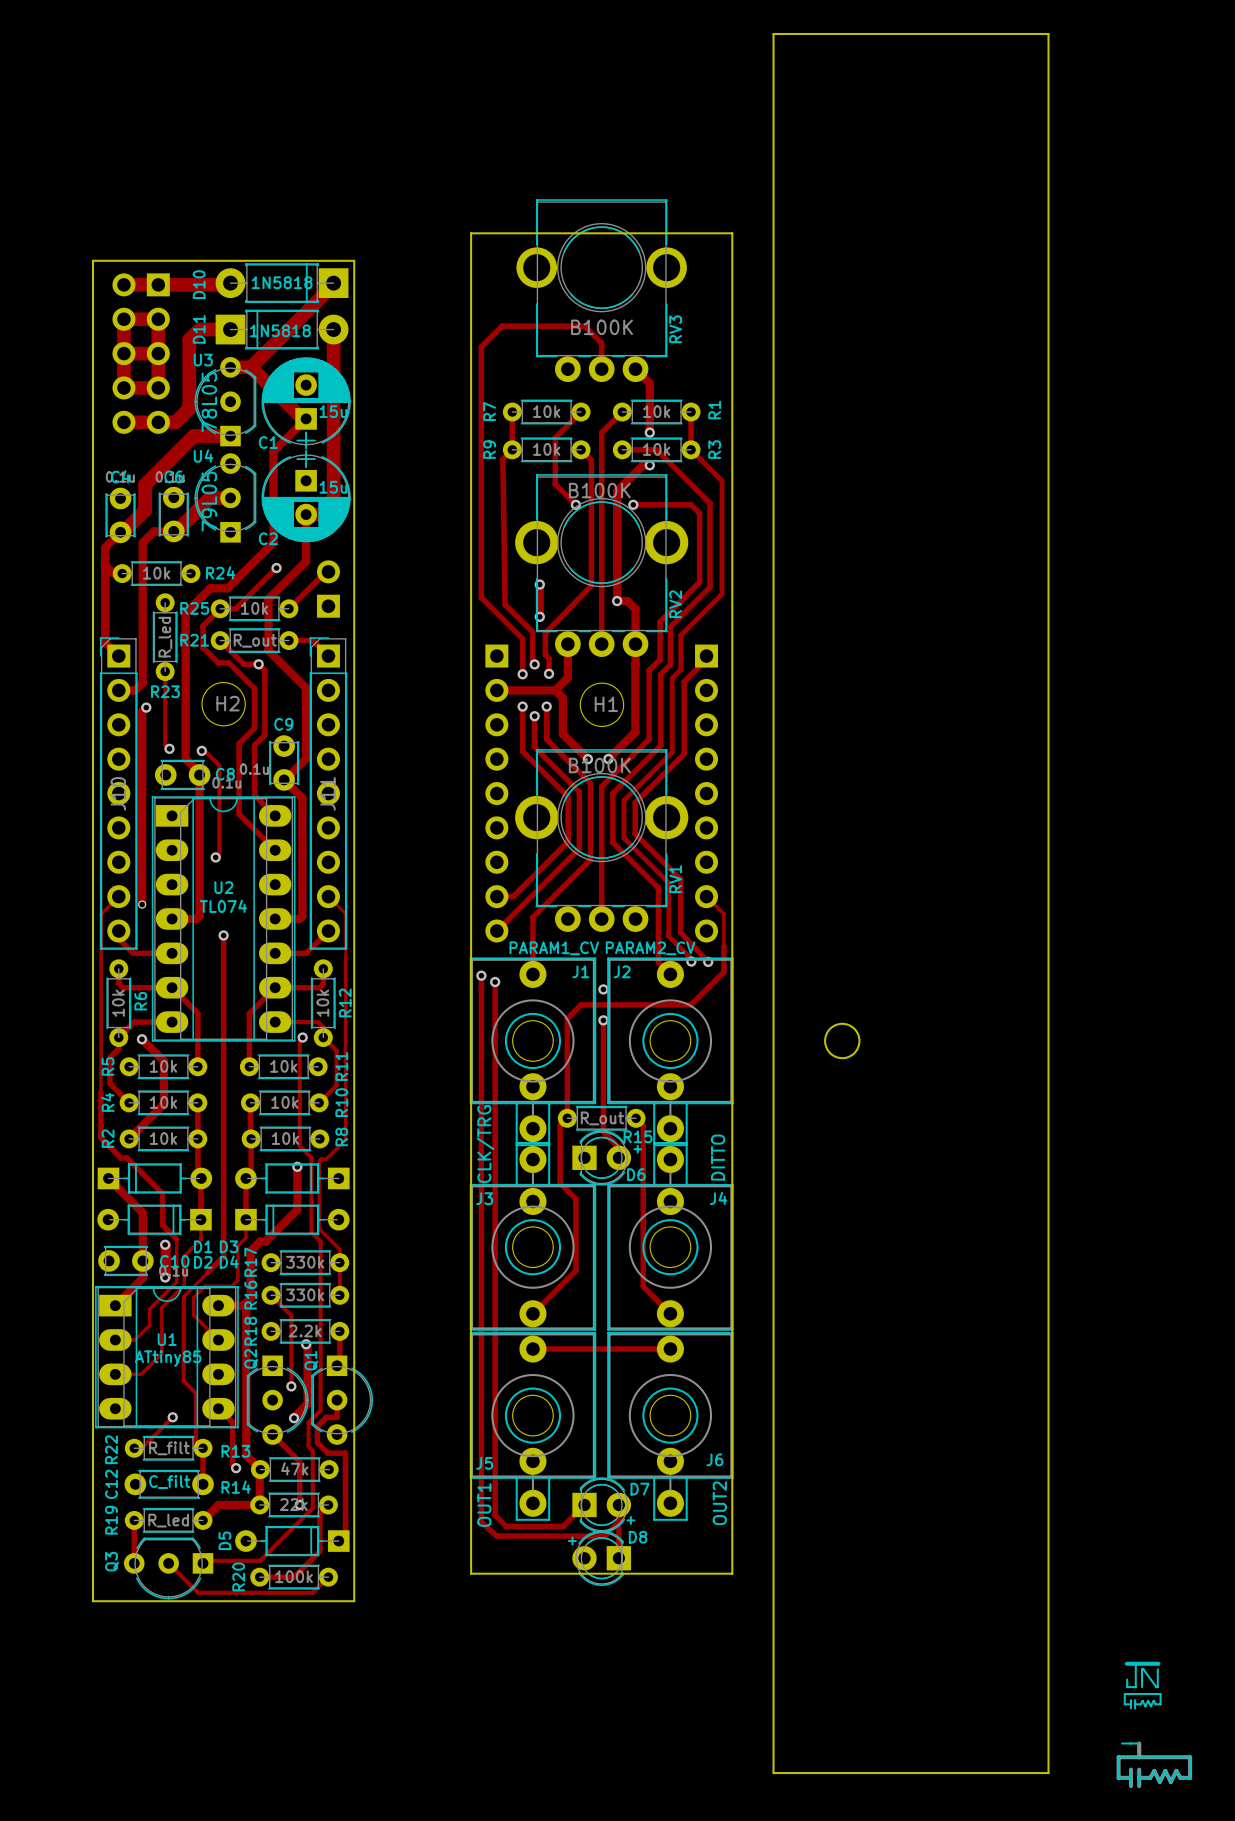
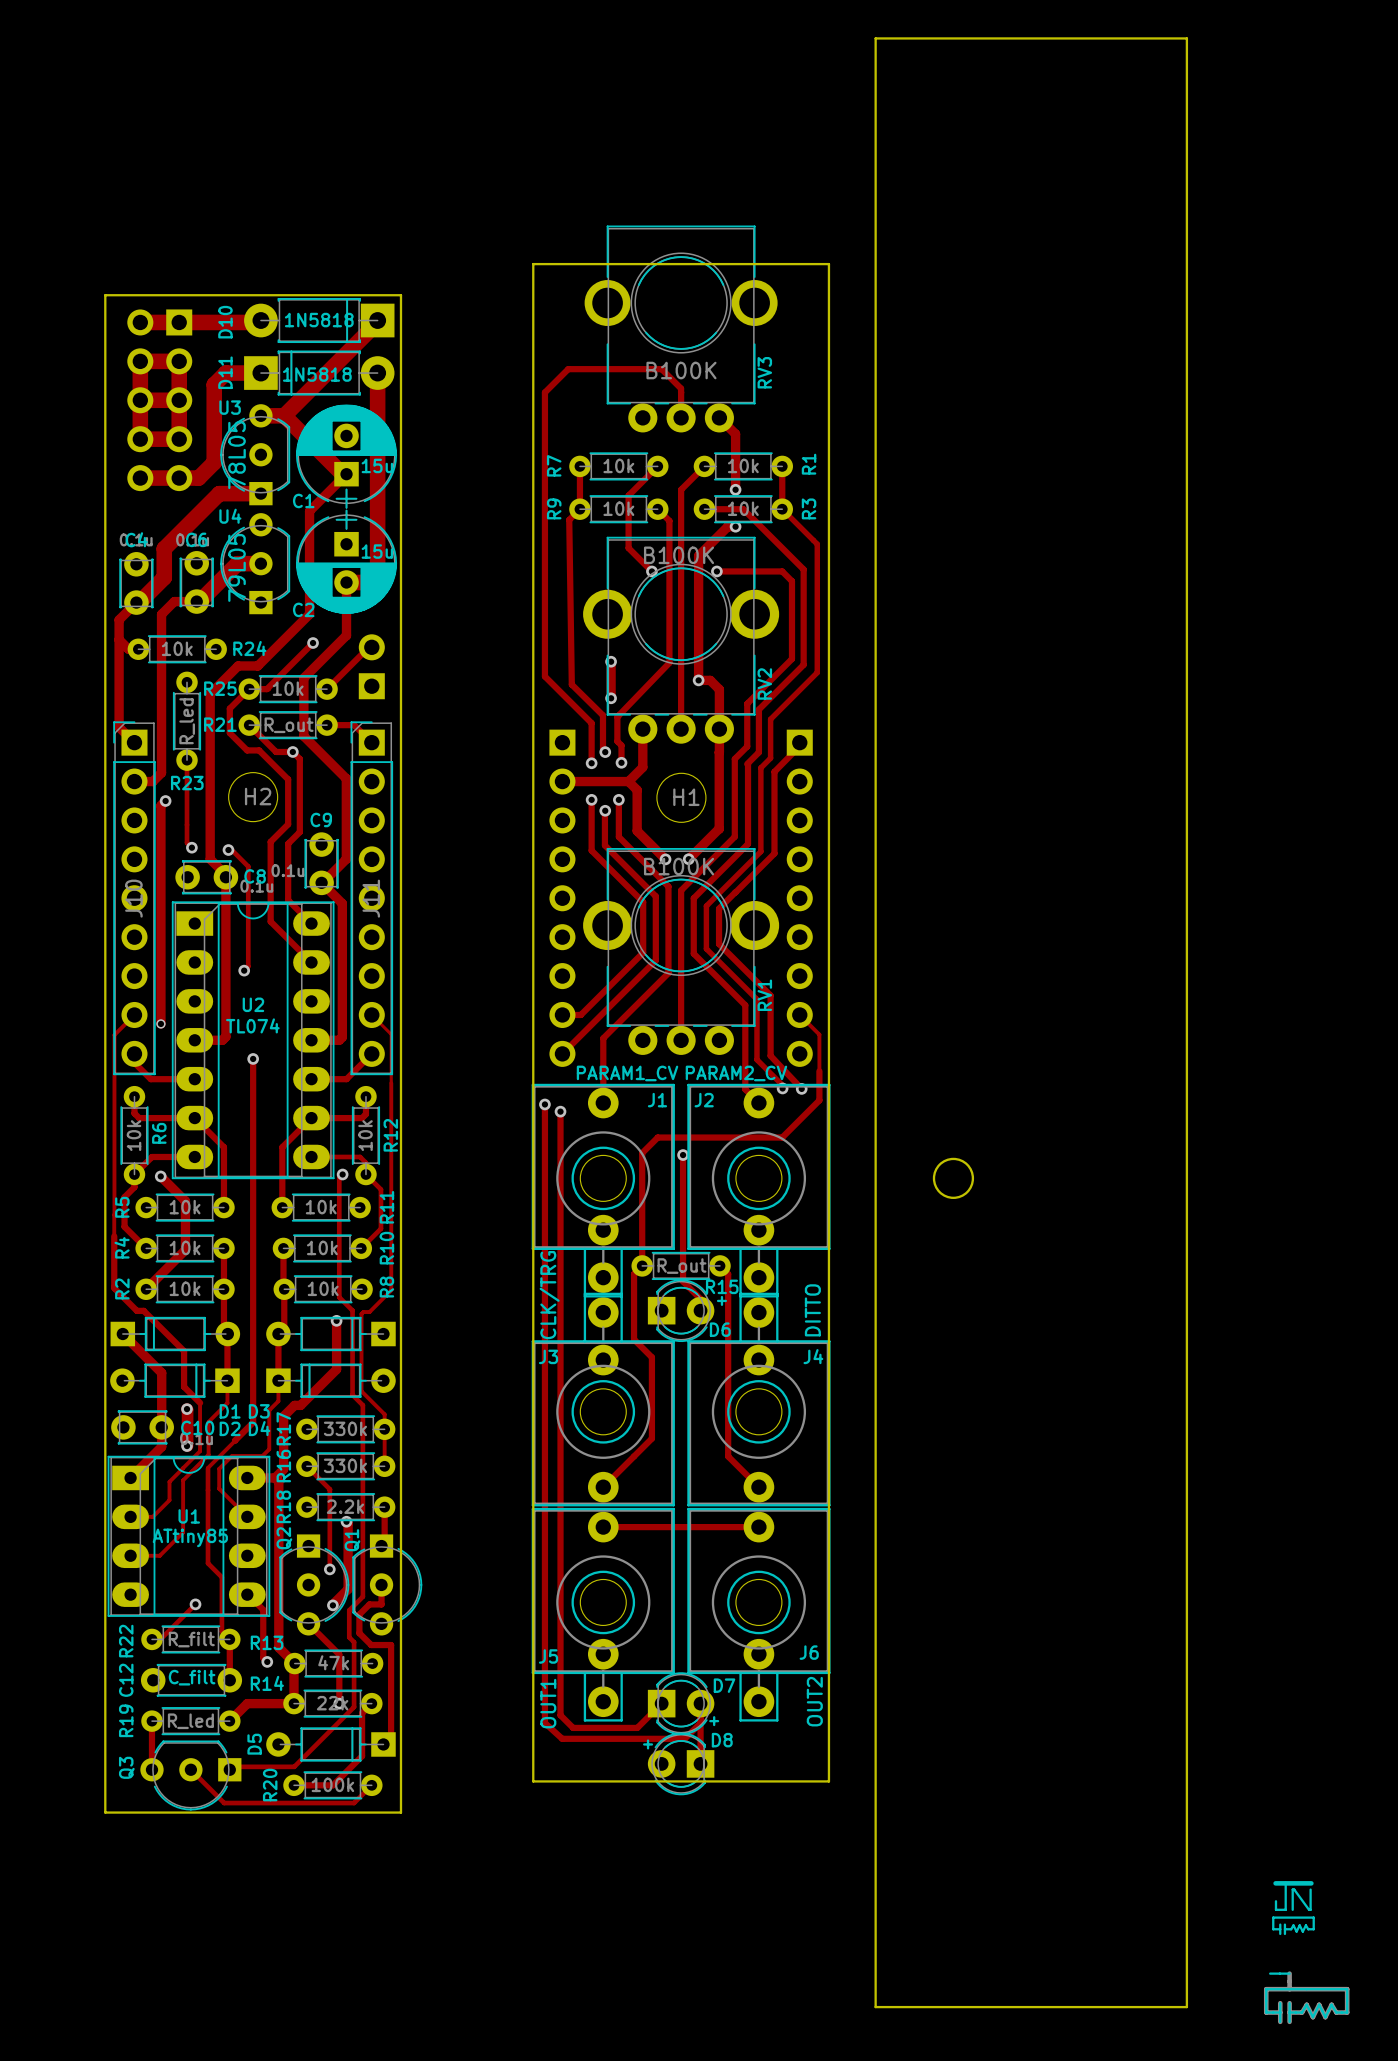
via: (603, 989) -> none

